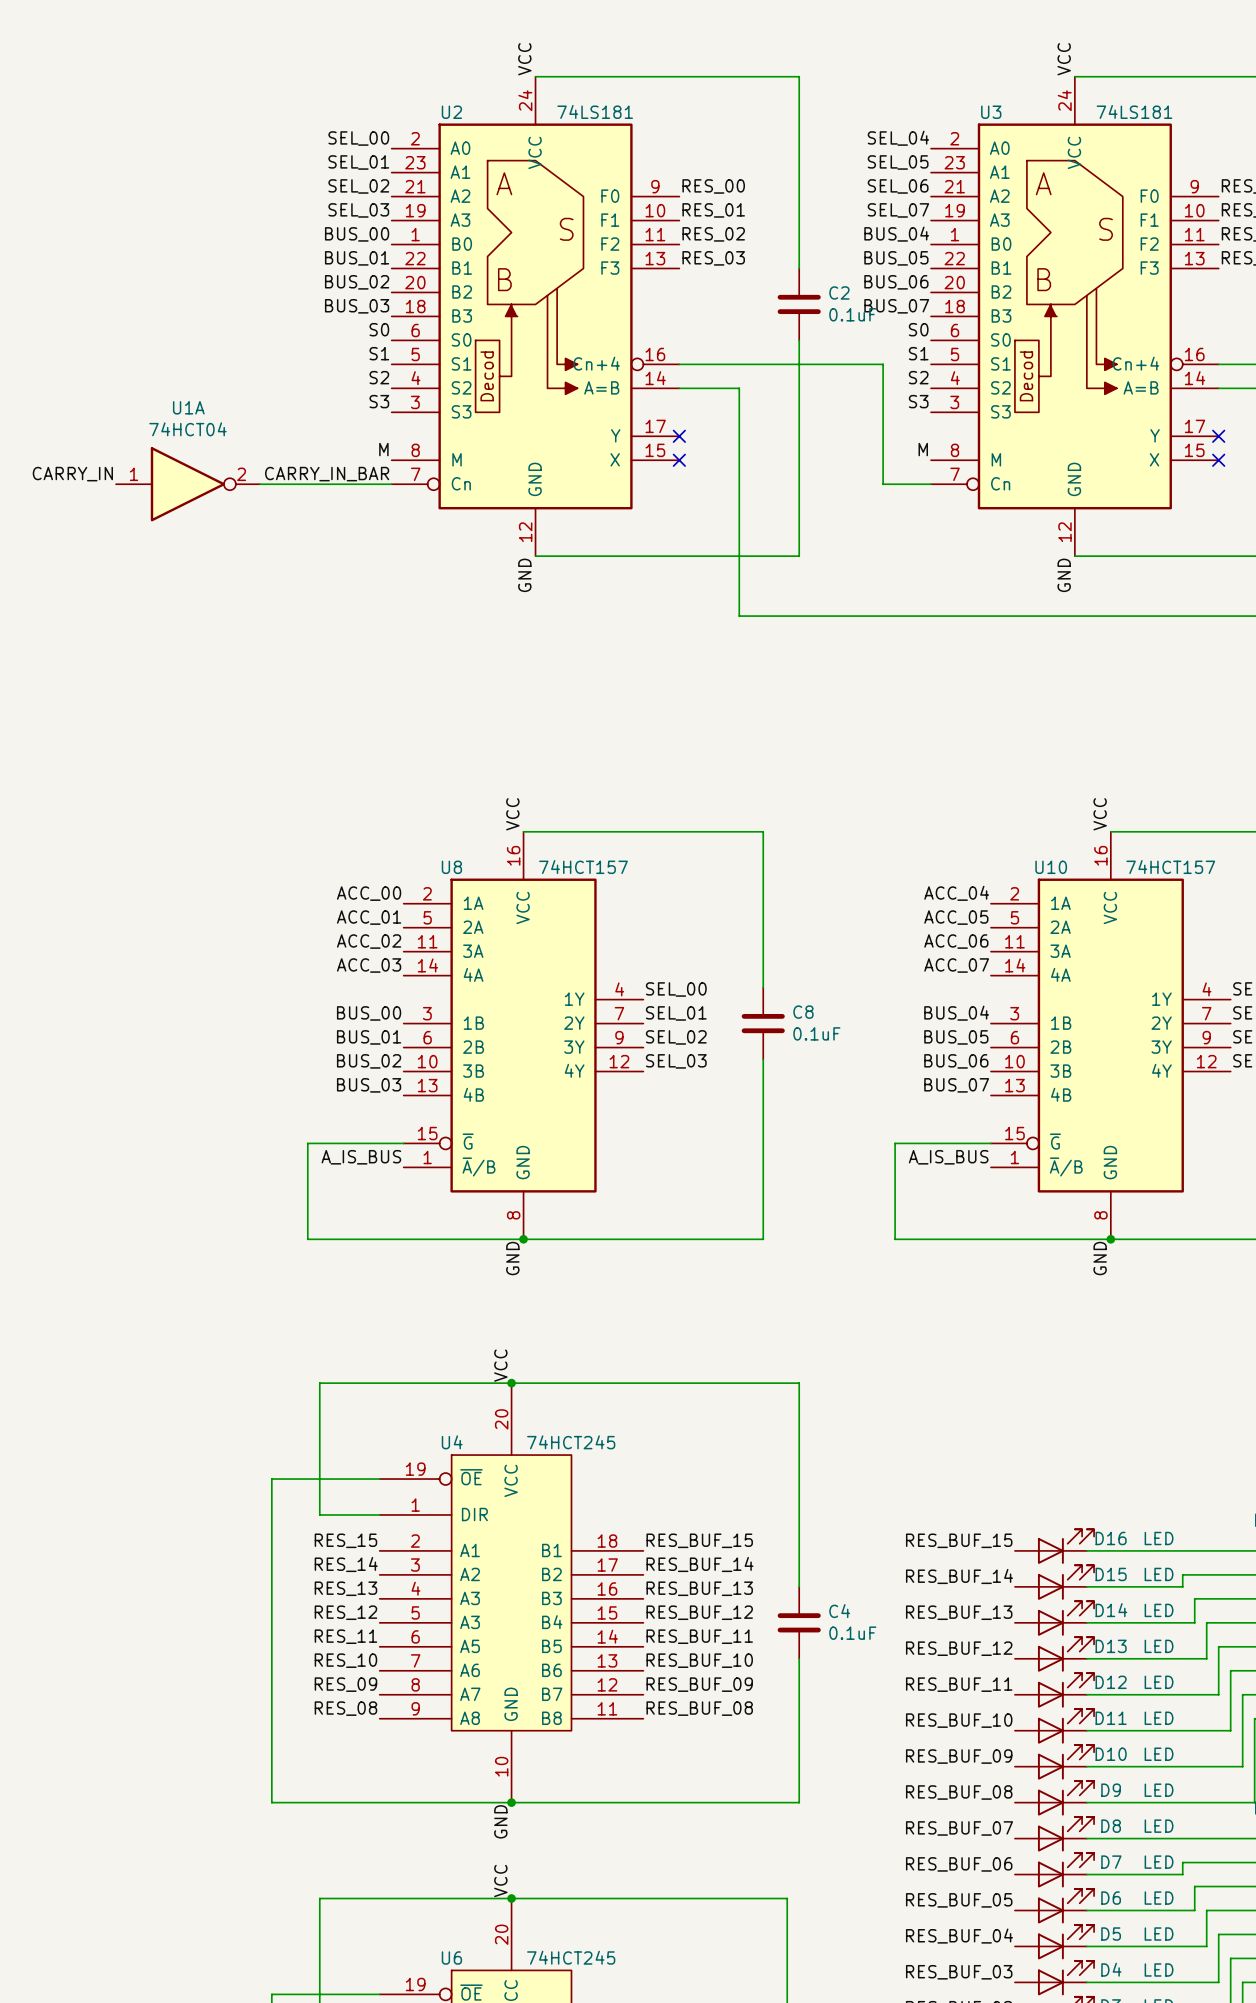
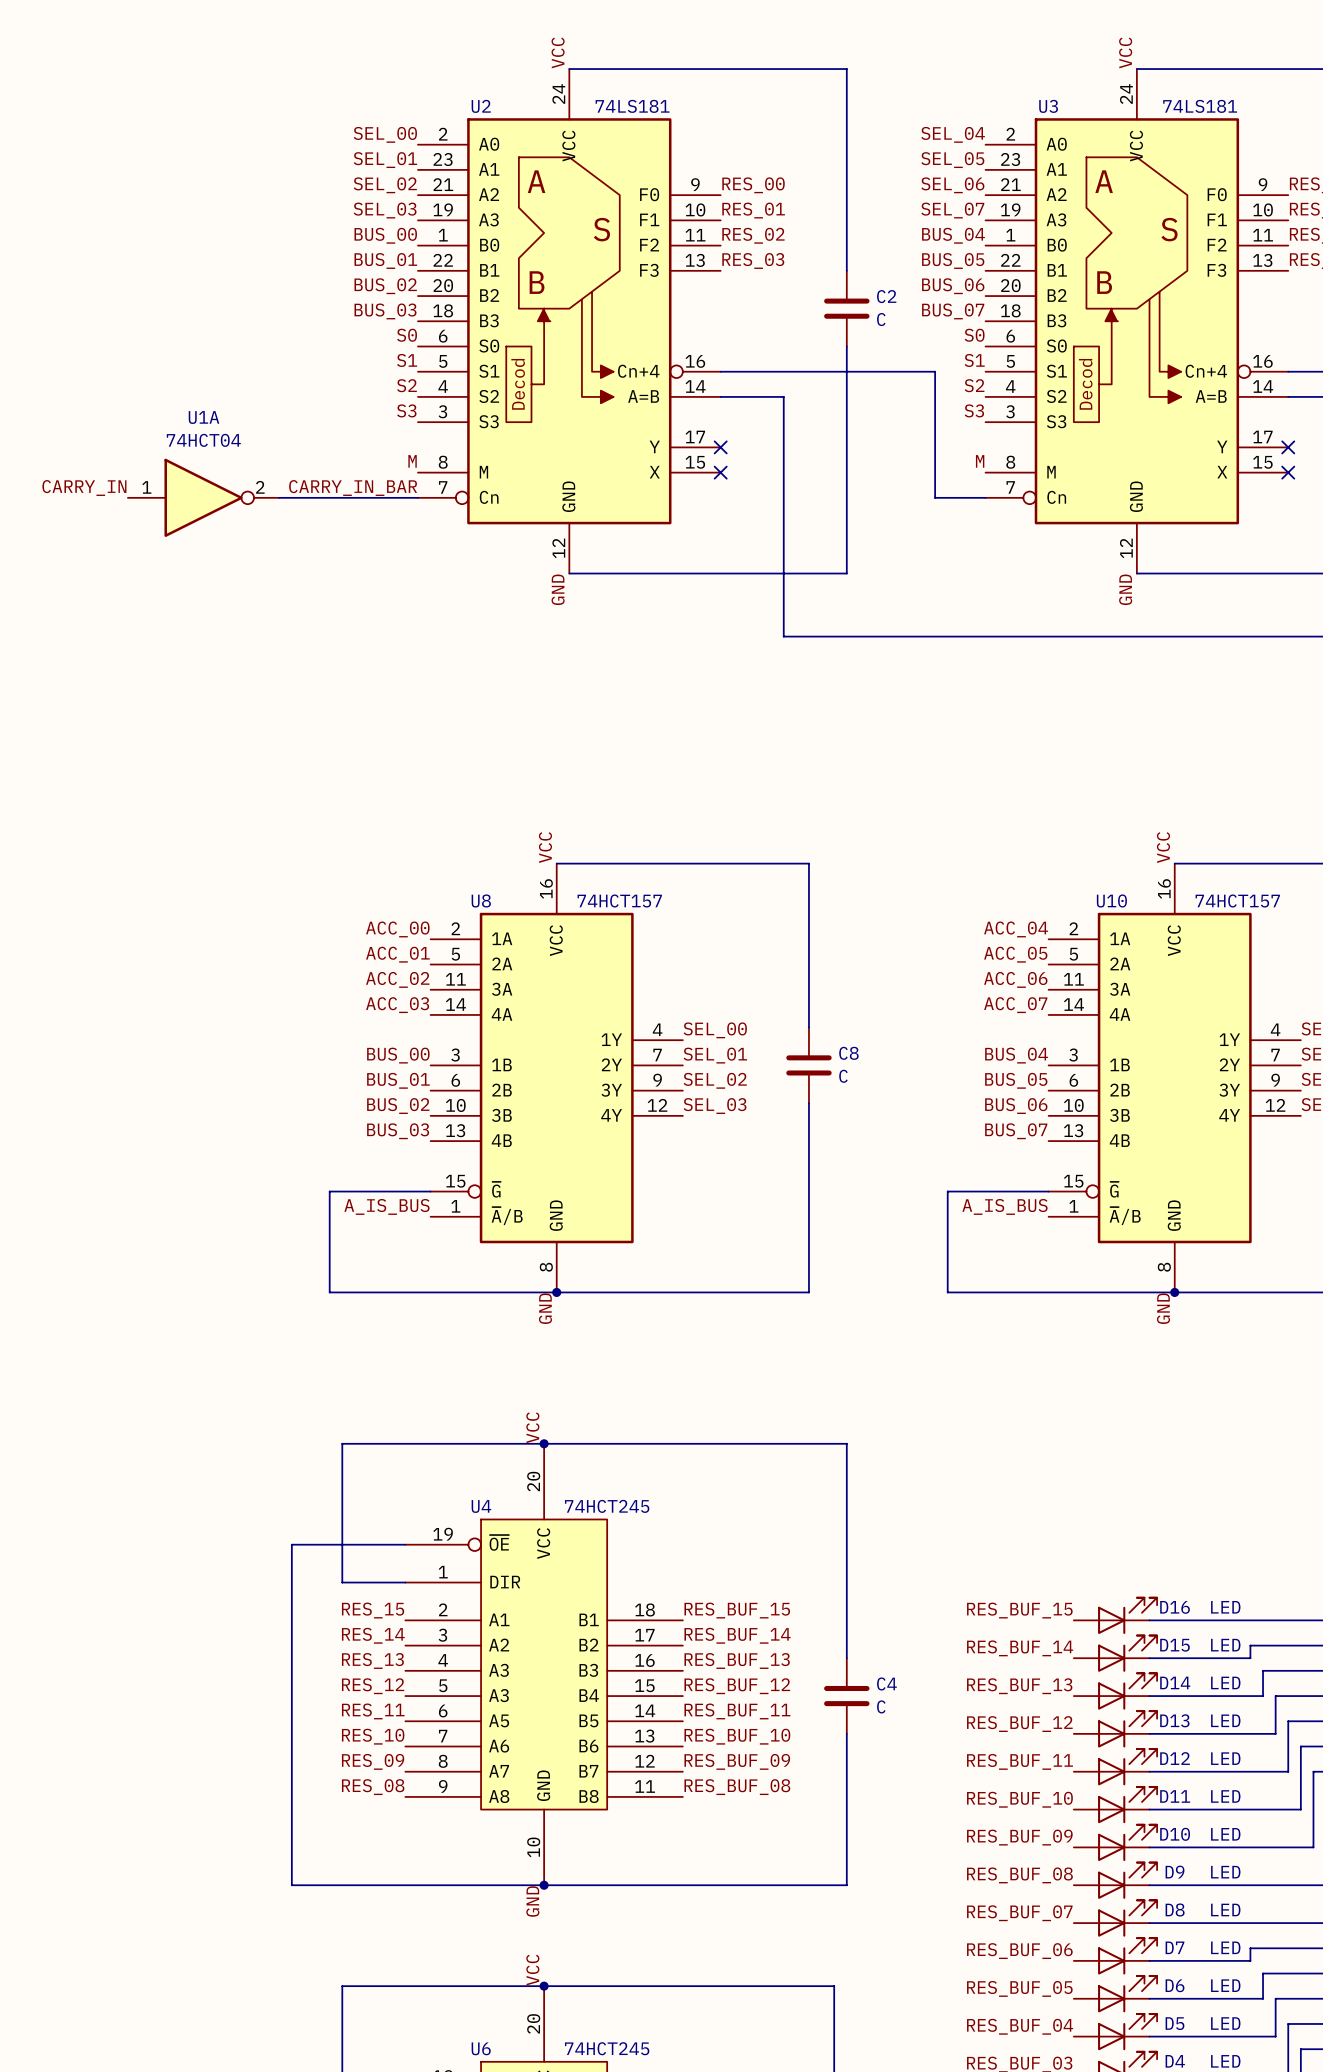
C2 value: 0.1uF (852, 314) -> C (881, 319)
C8 value: 0.1uF (816, 1033) -> C (843, 1076)
C4 value: 0.1uF (852, 1633) -> C (881, 1706)

